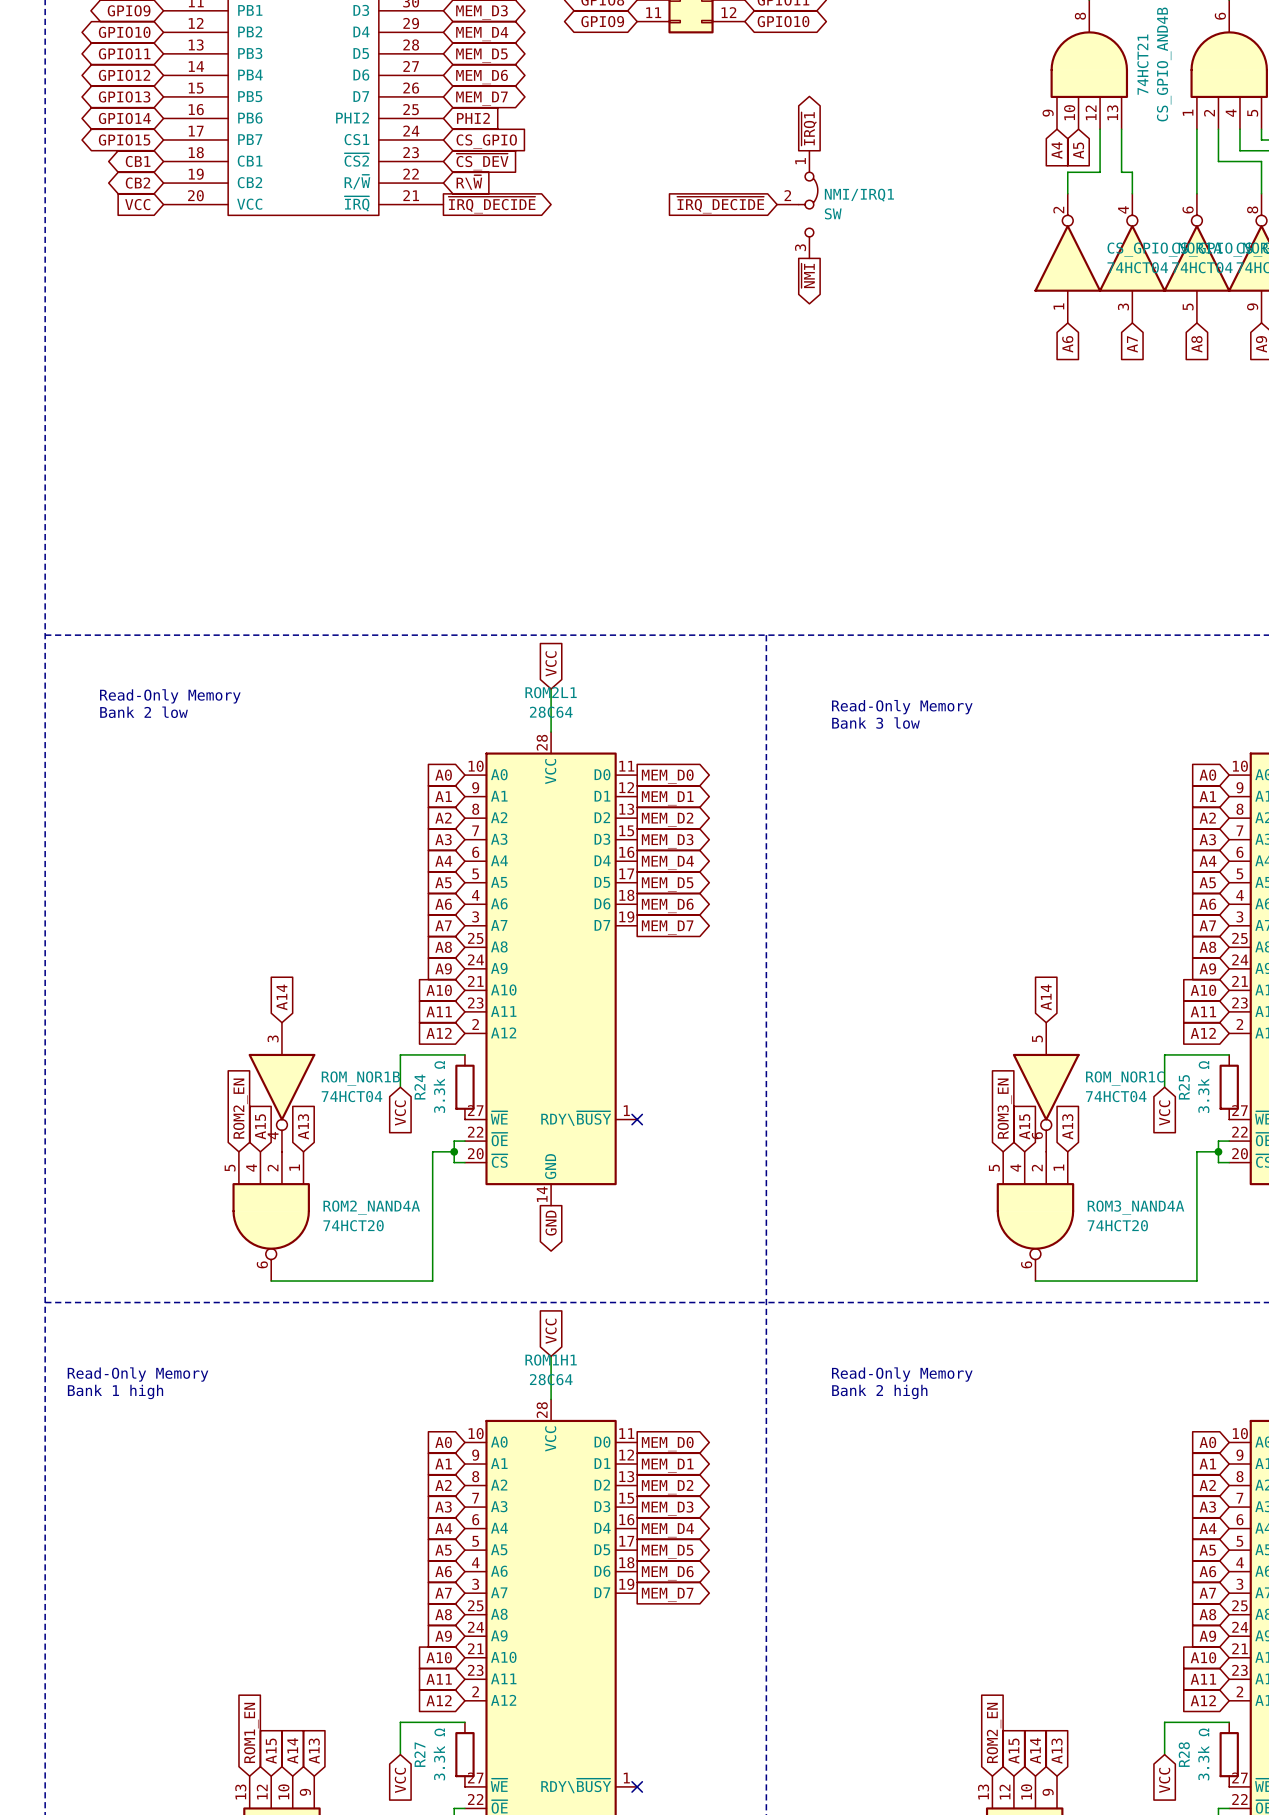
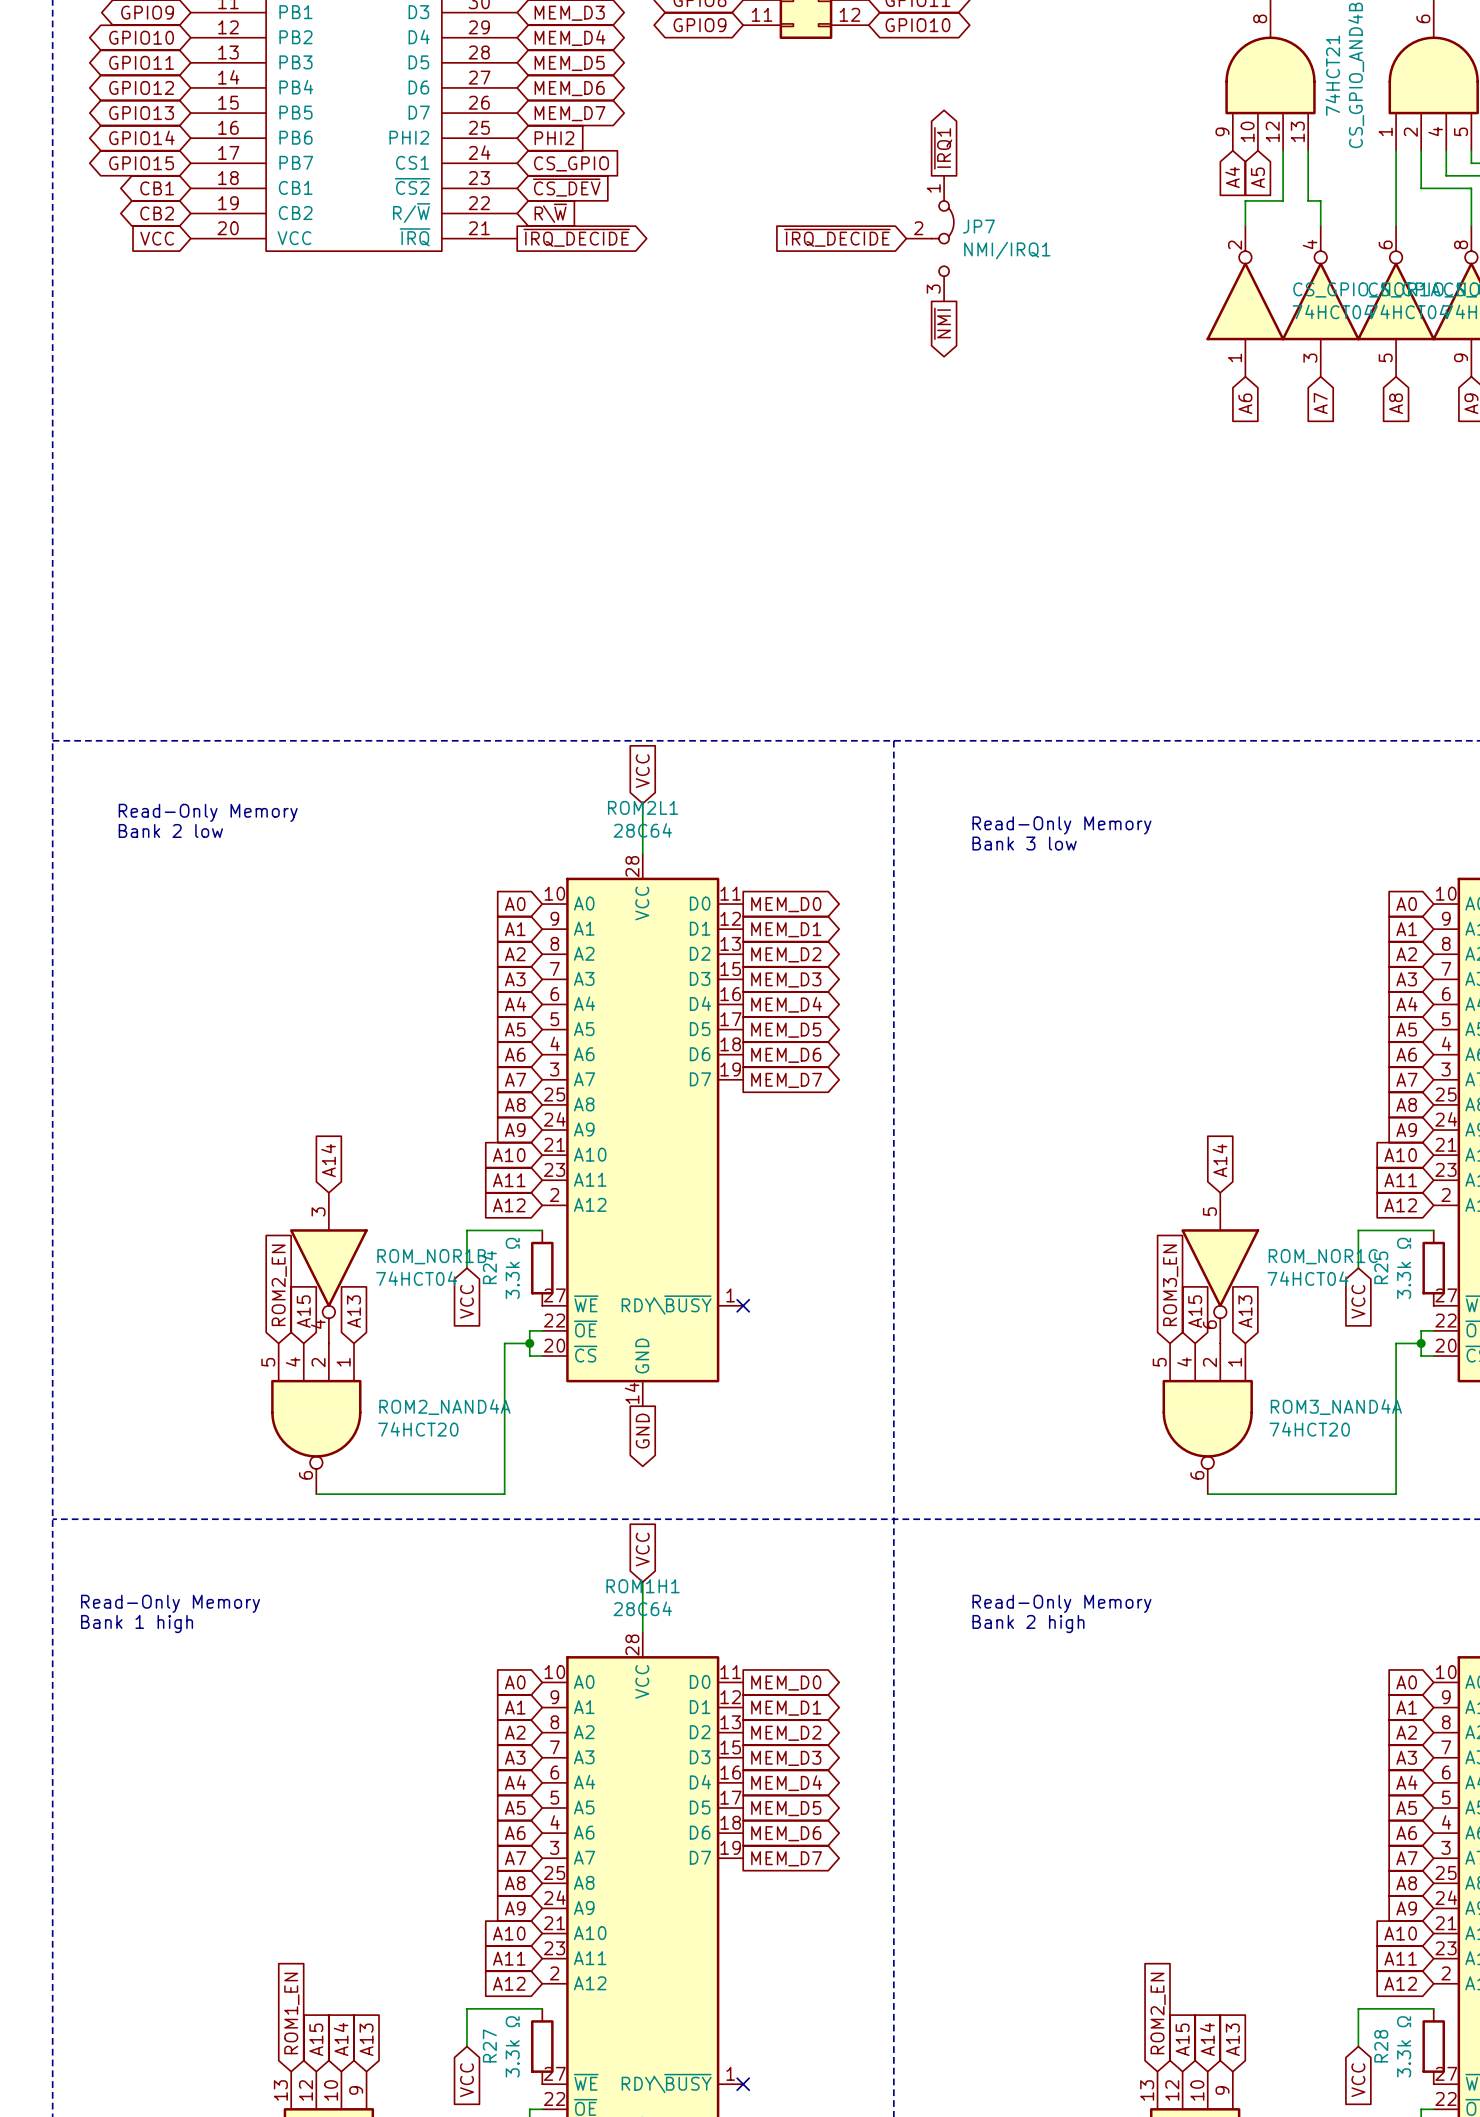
NMI/IRQ1 name: NMI/IRQ1 (859, 195) -> JP7 (978, 226)
NMI/IRQ1 value: SW (833, 213) -> NMI/IRQ1 (1007, 250)

